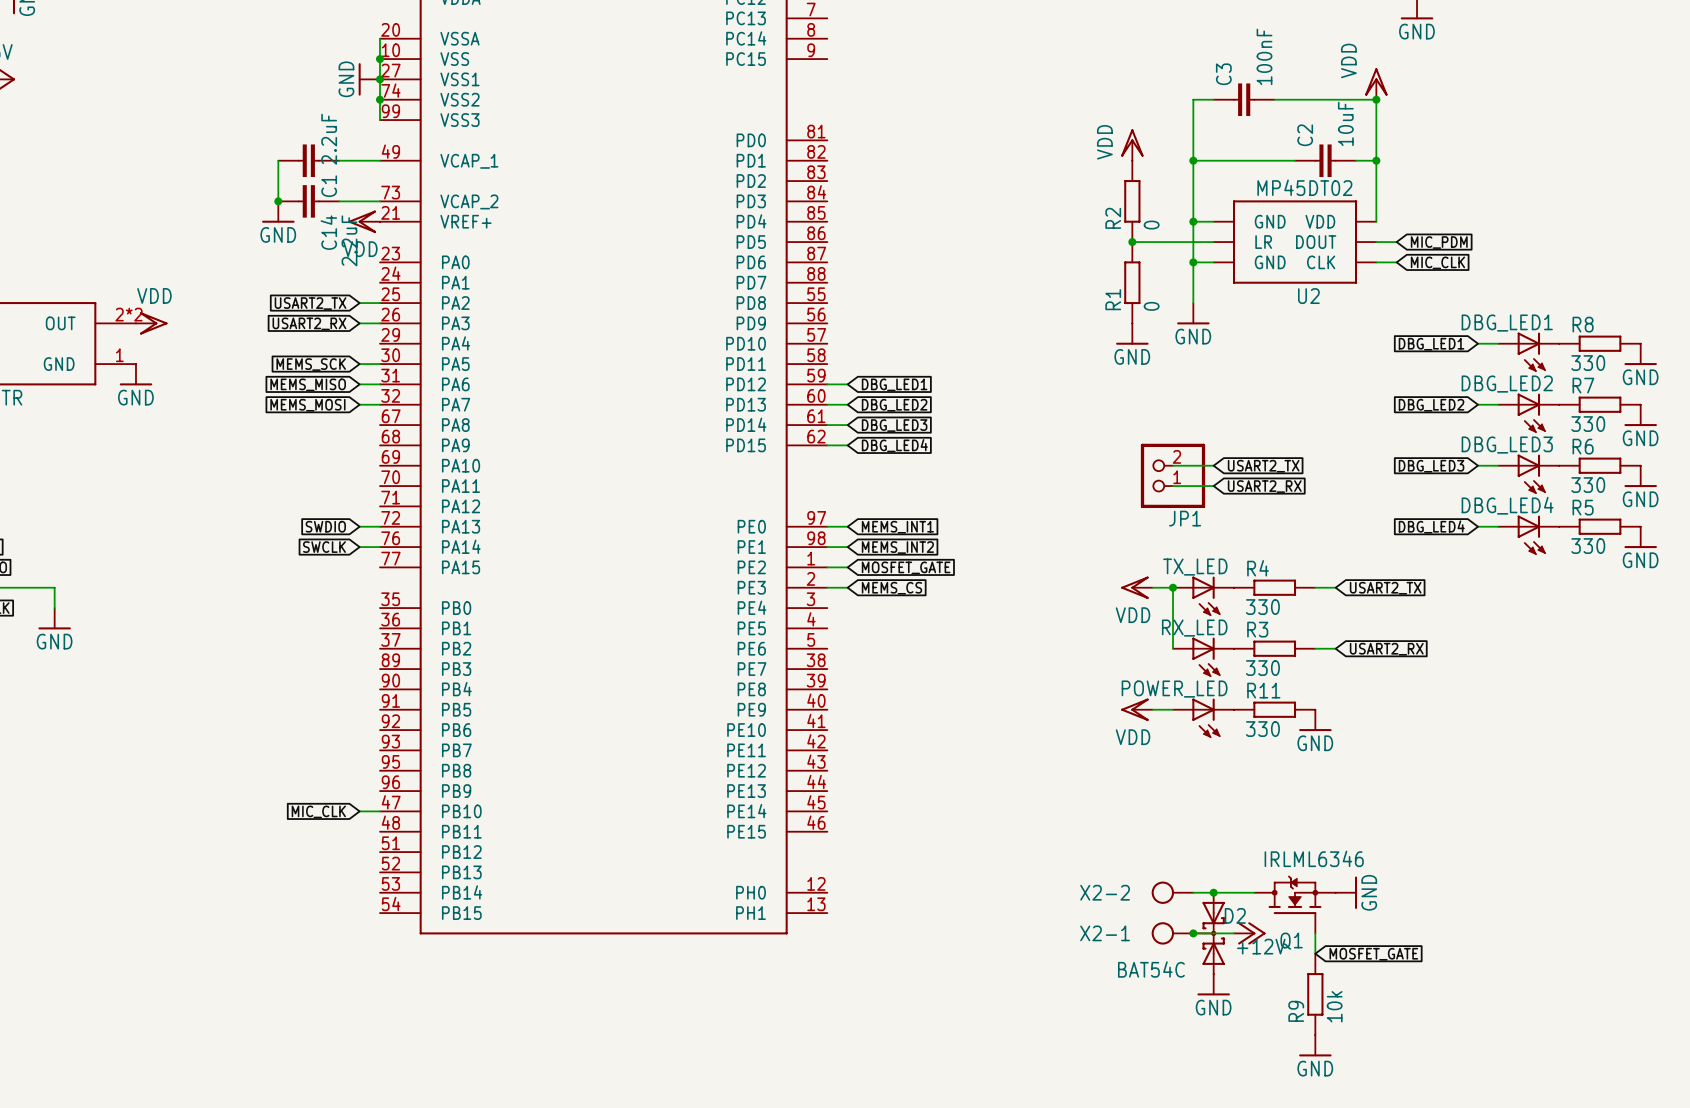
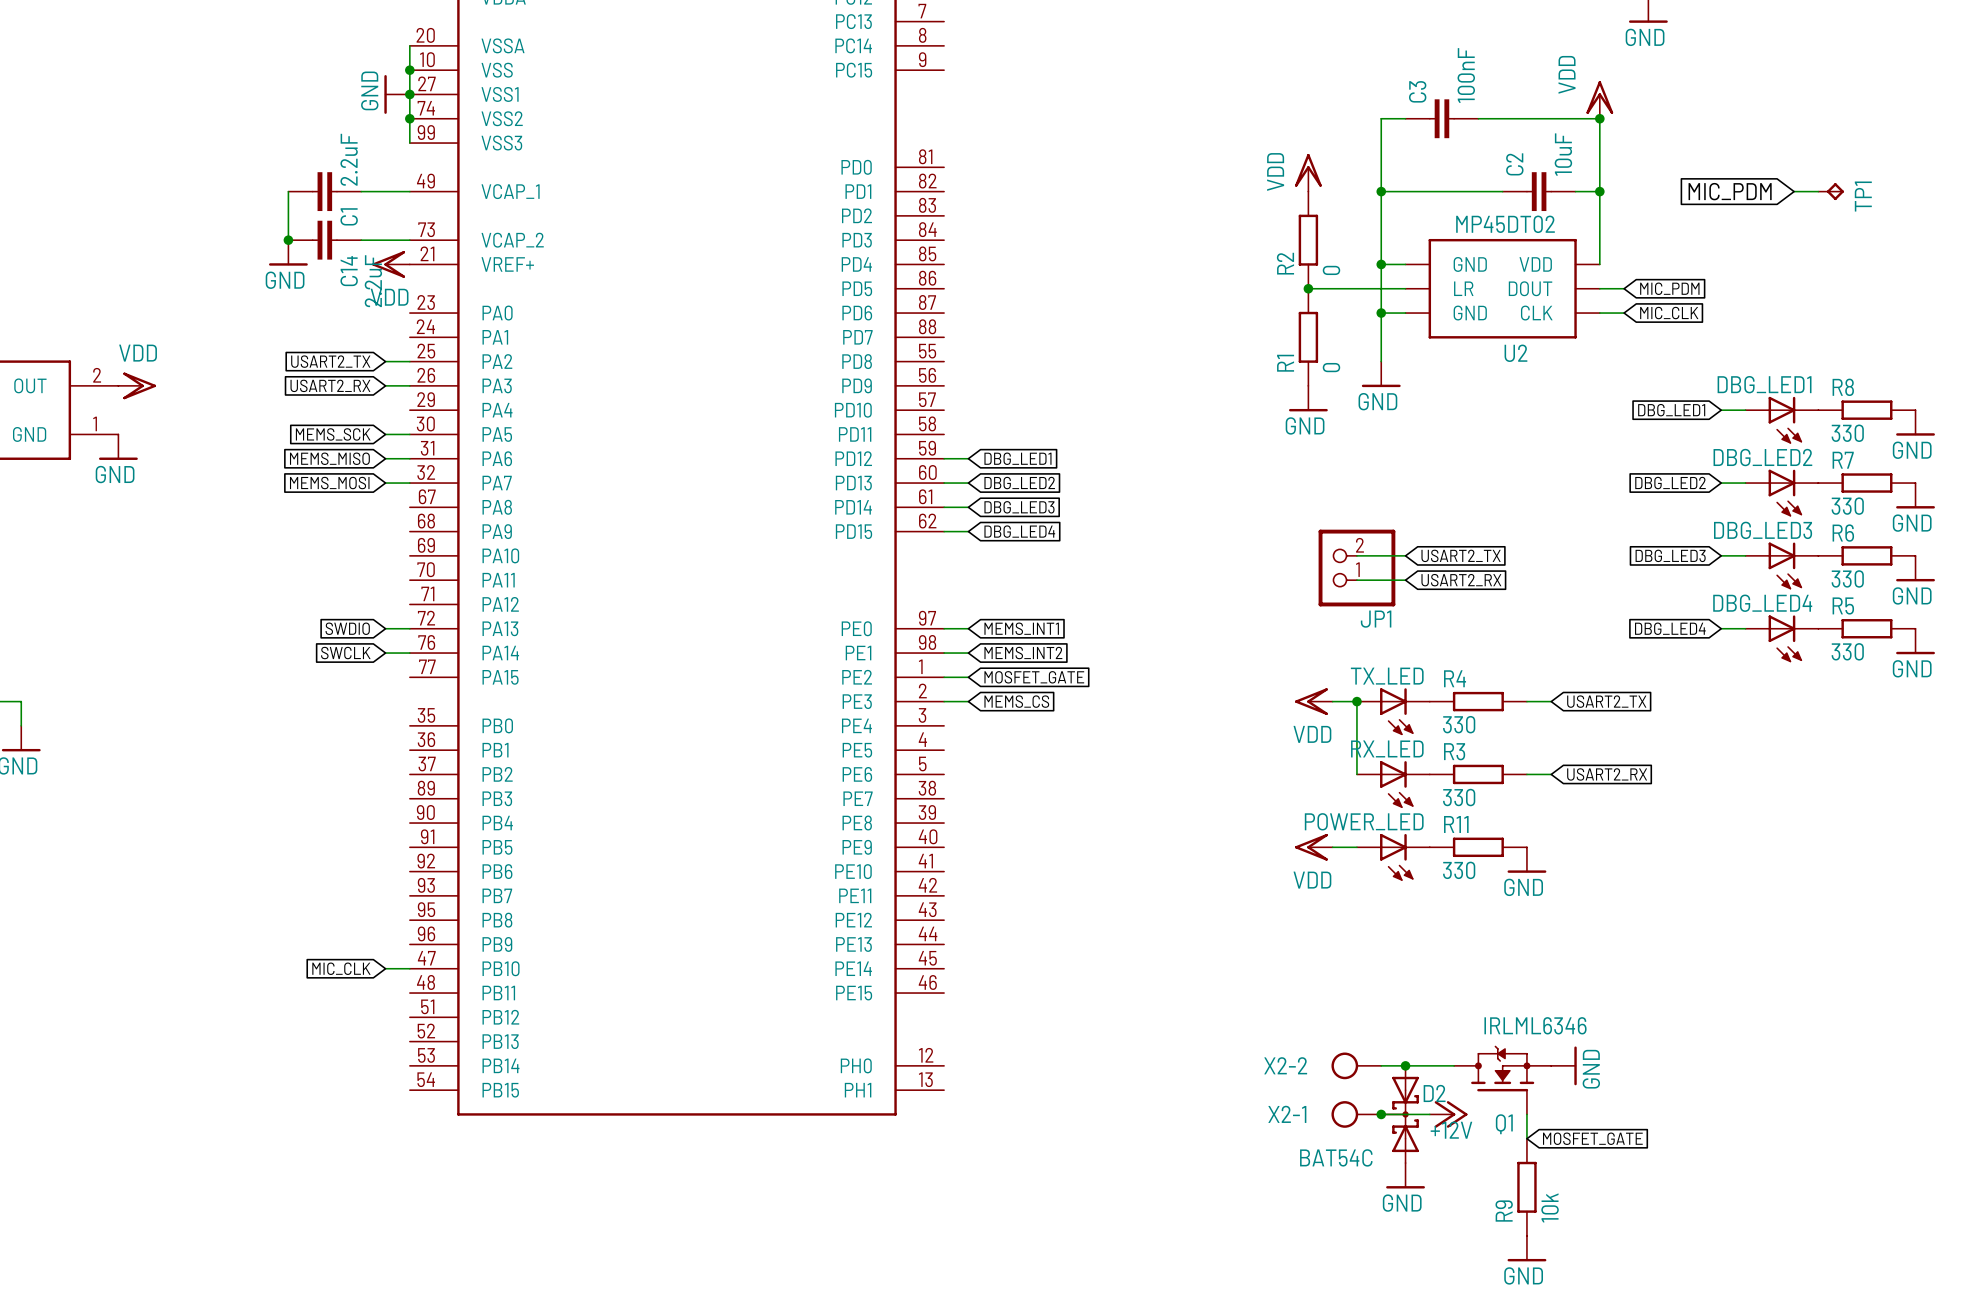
wire: none -> (1794, 191) (1818, 191)
TP1: none -> (1831, 191)
global label: none -> MIC_PDM (1730, 191)
part pin number: 2*2 (129, 314) -> 2 (97, 375)

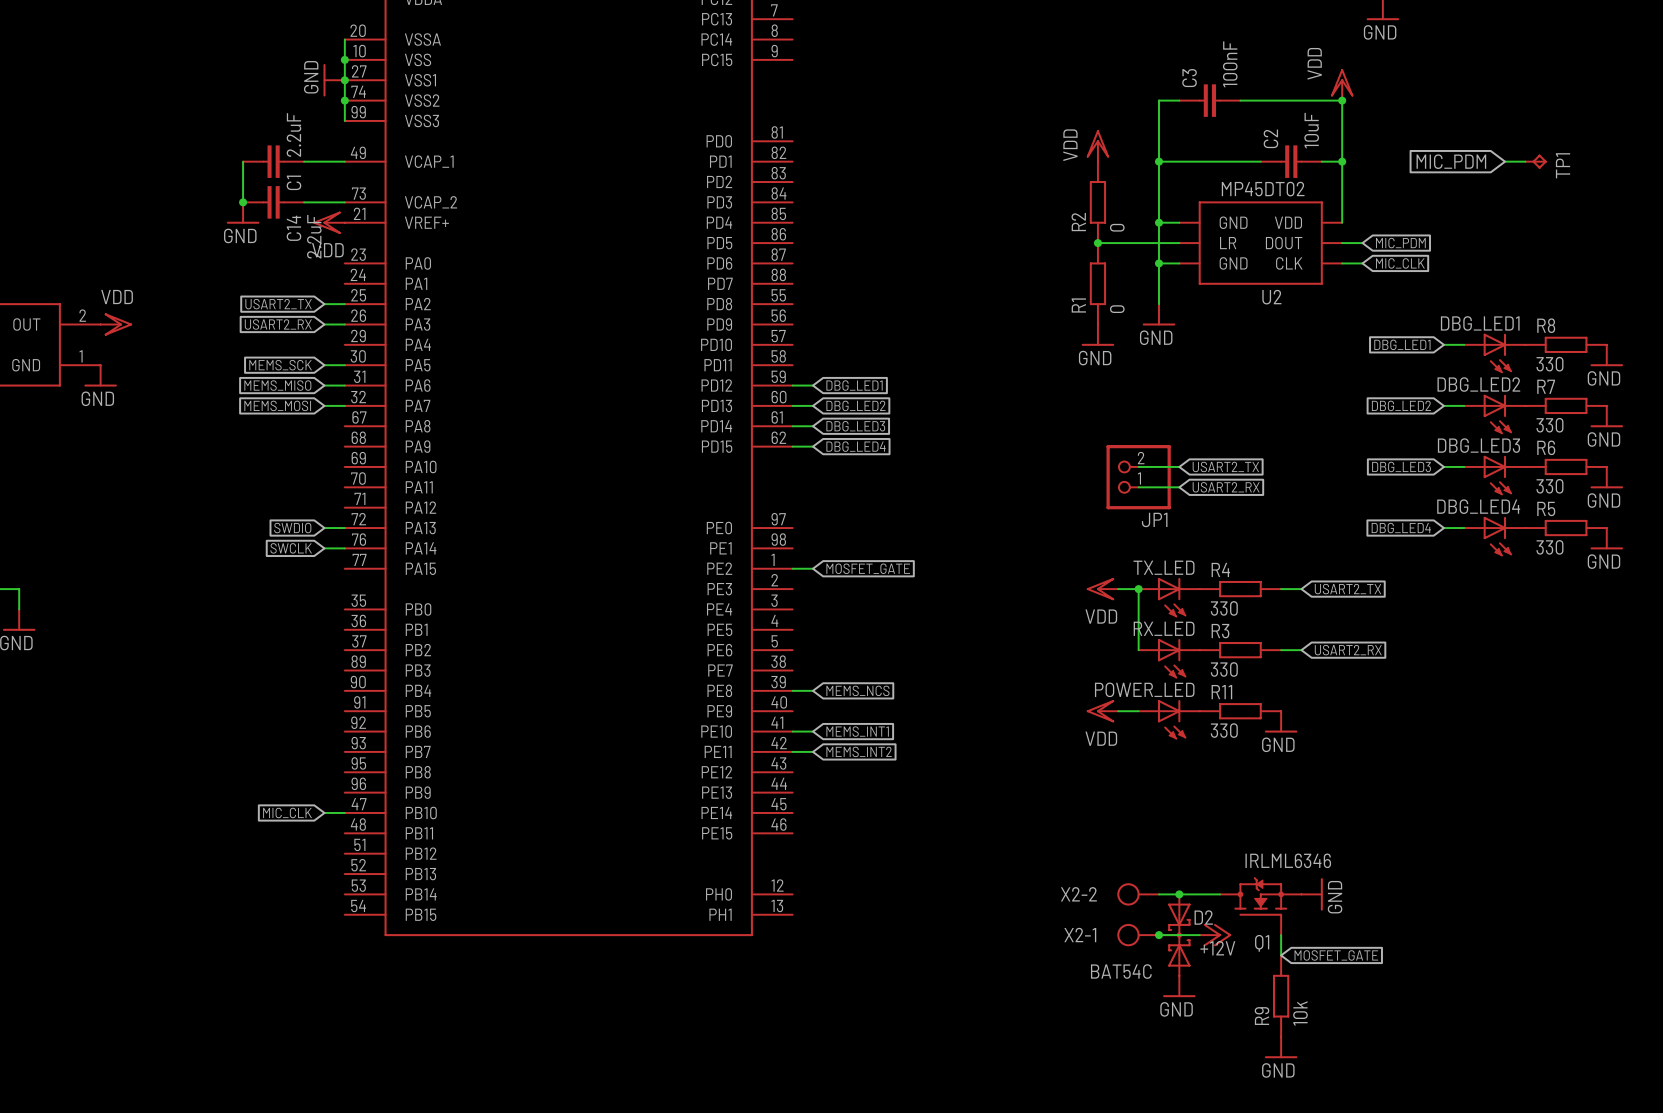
wire: (944, 628) (968, 628) -> none
global label: MEMS_INT1 (1021, 628) -> none
wire: (944, 653) (968, 653) -> (792, 731) (812, 731)
global label: MEMS_INT2 (1023, 653) -> none
wire: (944, 701) (968, 701) -> (792, 690) (812, 690)
global label: MEMS_CS (1016, 701) -> none
global label: none -> MEMS_NCS (857, 690)
global label: none -> MEMS_INT1 (857, 731)
wire: none -> (792, 751) (812, 751)
global label: none -> MEMS_INT2 (859, 751)

